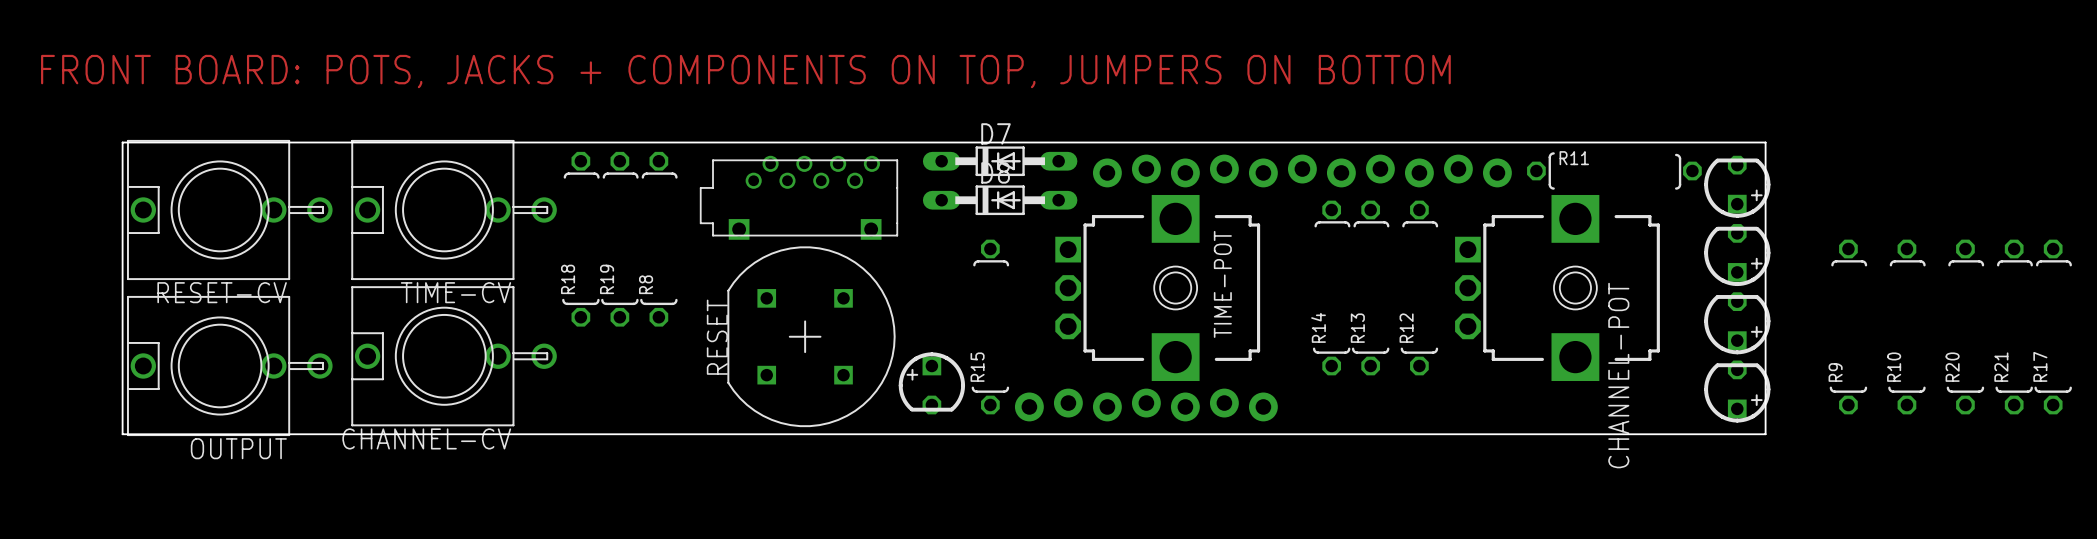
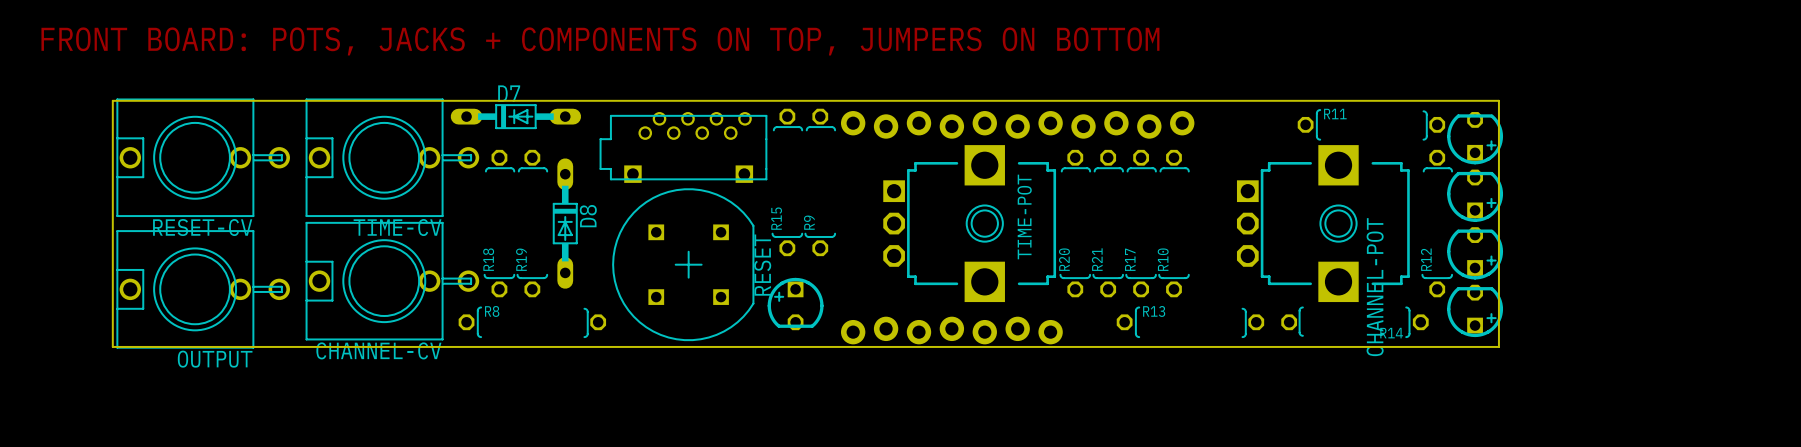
D7 position: (1000, 161) -> (515, 116)
part rotation: 0° (1302, 170) -> 180° (1017, 124)
D8 rotation: 0° (1000, 200) -> 90° clockwise (565, 223)
D8 position: (1000, 200) -> (565, 223)
R18 position: (580, 239) -> (499, 223)
R19 position: (619, 239) -> (532, 223)
R8 rotation: 0° (658, 239) -> 90° clockwise (532, 322)
R8 position: (658, 239) -> (532, 322)
TIME-POT position: (1157, 287) -> (969, 223)
R14 rotation: 0° (1331, 287) -> 90° counterclockwise (1354, 322)
R14 position: (1331, 287) -> (1354, 322)
R13 rotation: 0° (1370, 287) -> 90° clockwise (1190, 322)
R13 position: (1370, 287) -> (1190, 322)
R12 position: (1419, 287) -> (1437, 223)
R15 position: (990, 326) -> (787, 182)
R9 position: (1848, 326) -> (820, 182)
R10 position: (1906, 326) -> (1173, 223)
R20 position: (1965, 326) -> (1075, 223)
R21 position: (2014, 326) -> (1108, 223)
R17 position: (2053, 326) -> (1141, 223)
RESET rotation: 0° (811, 336) -> 180° (683, 264)
part position: (1146, 405) -> (951, 330)

